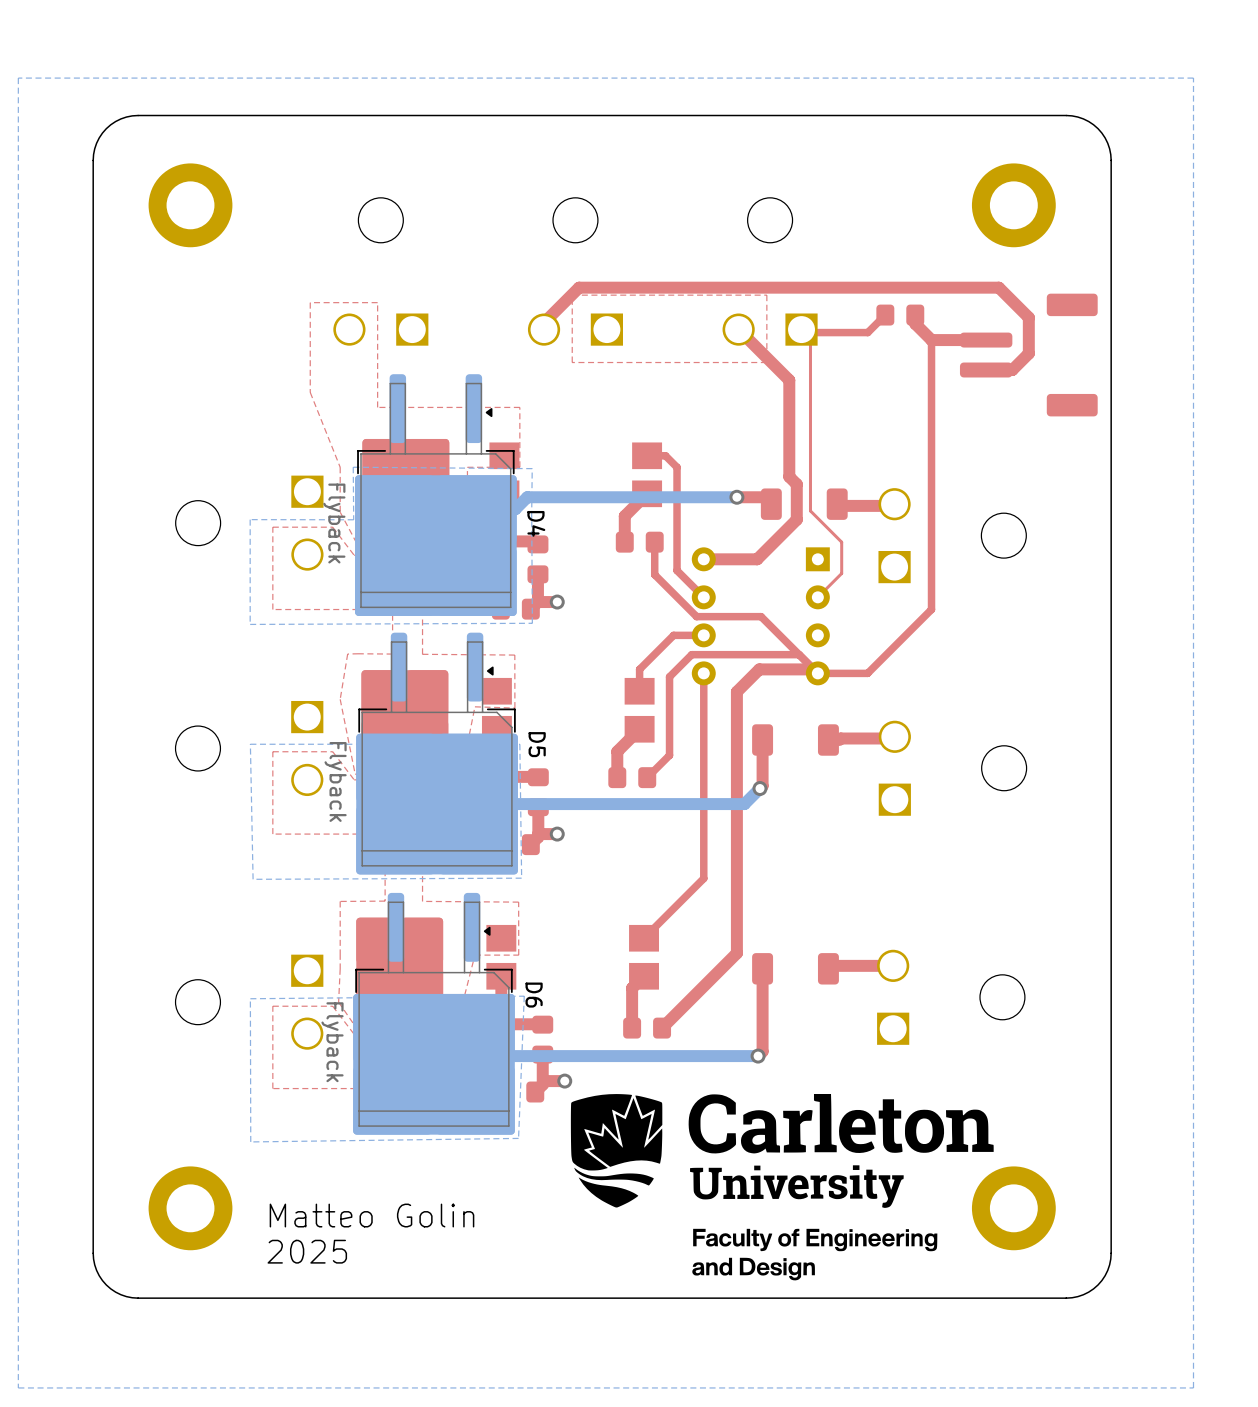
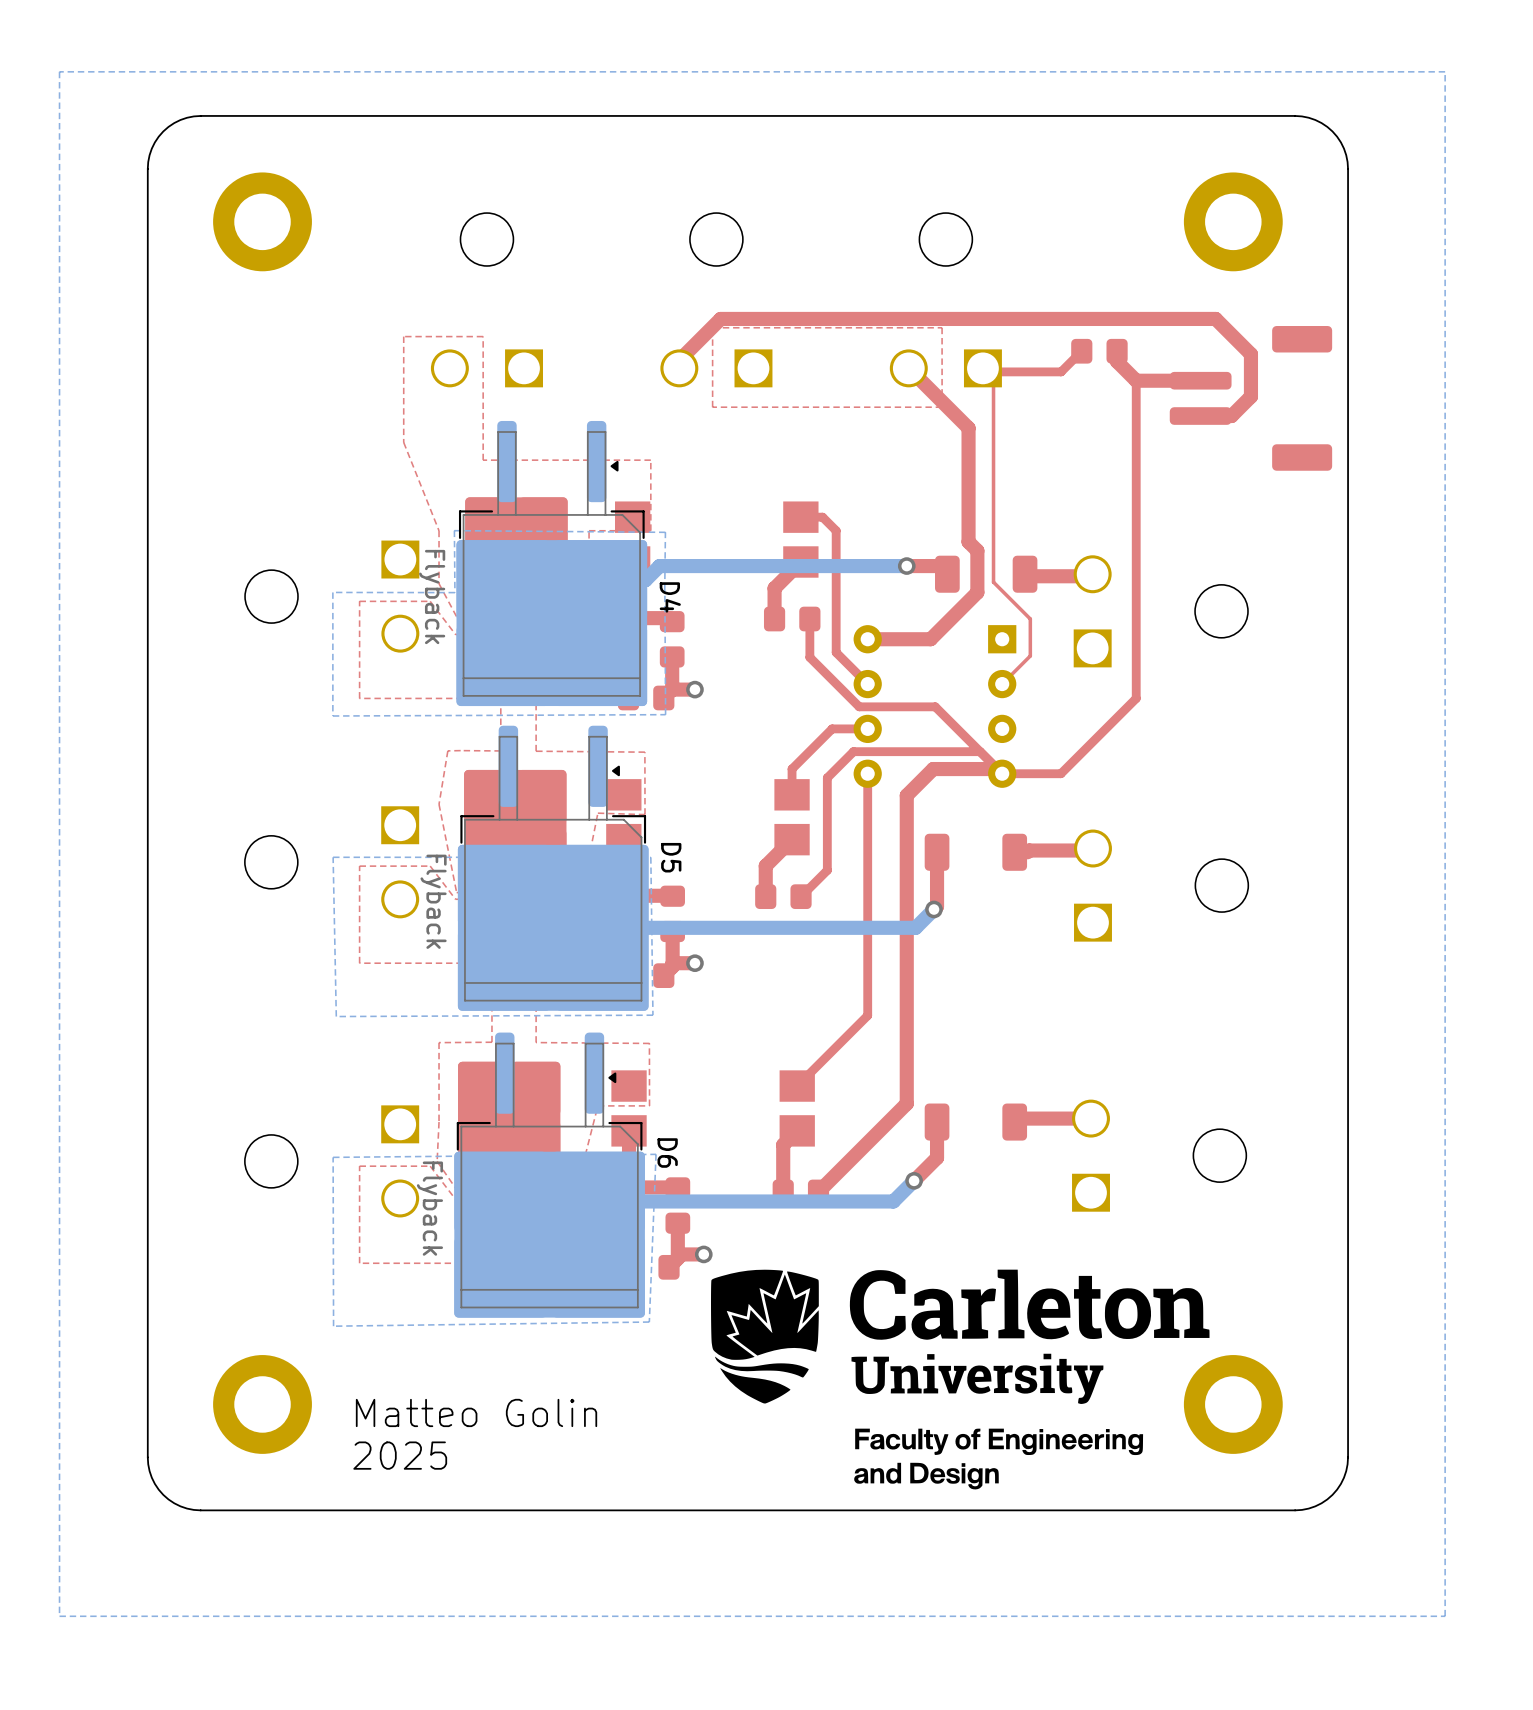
top track: (762, 999) (762, 1051) (758, 1056) -> (937, 1157) (914, 1180)
bottom track: (483, 1036) (503, 1056) (758, 1056) -> (608, 1201) (893, 1201) (914, 1180)
via position: (758, 1056) -> (914, 1180)

